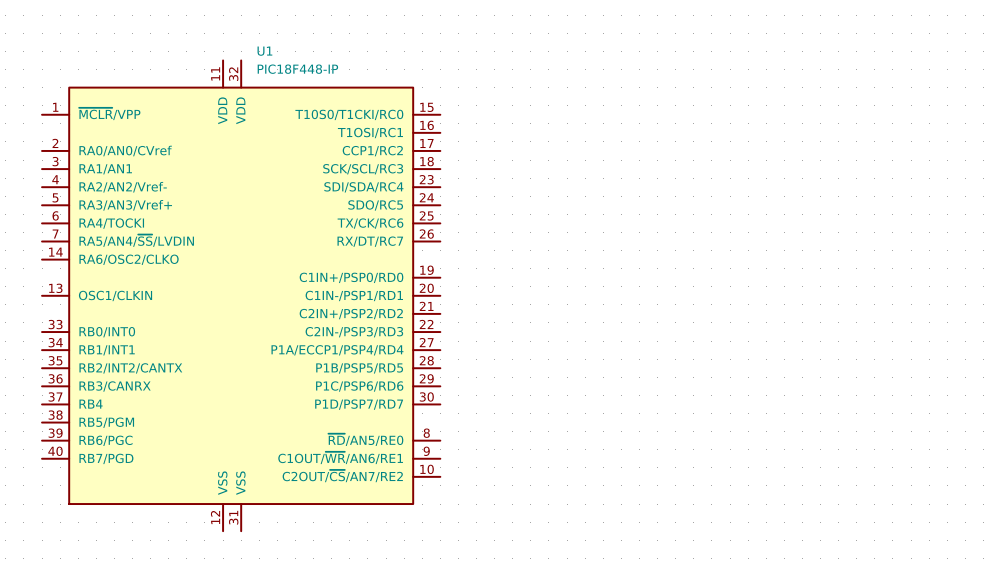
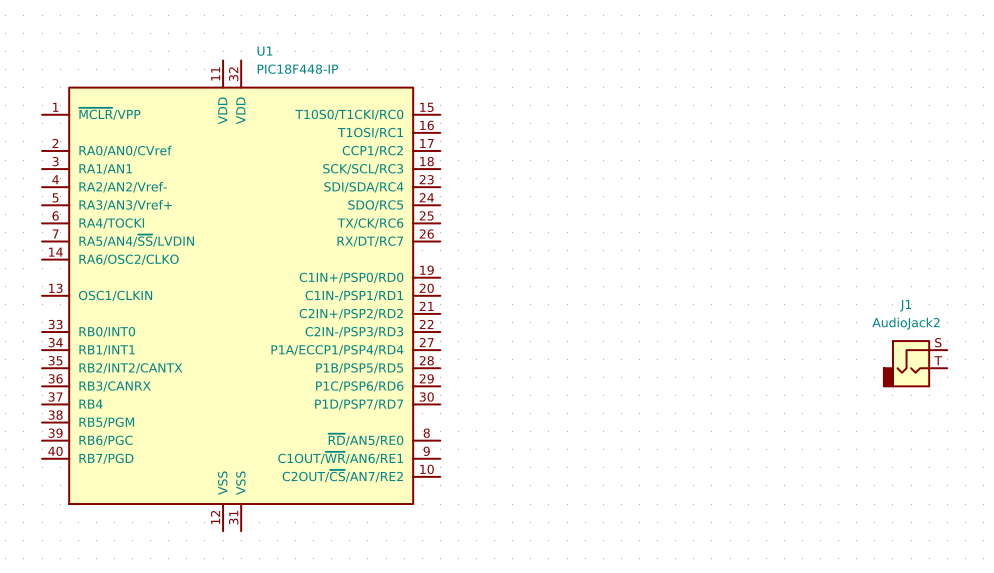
J1: none -> AudioJack2 (915, 363)

